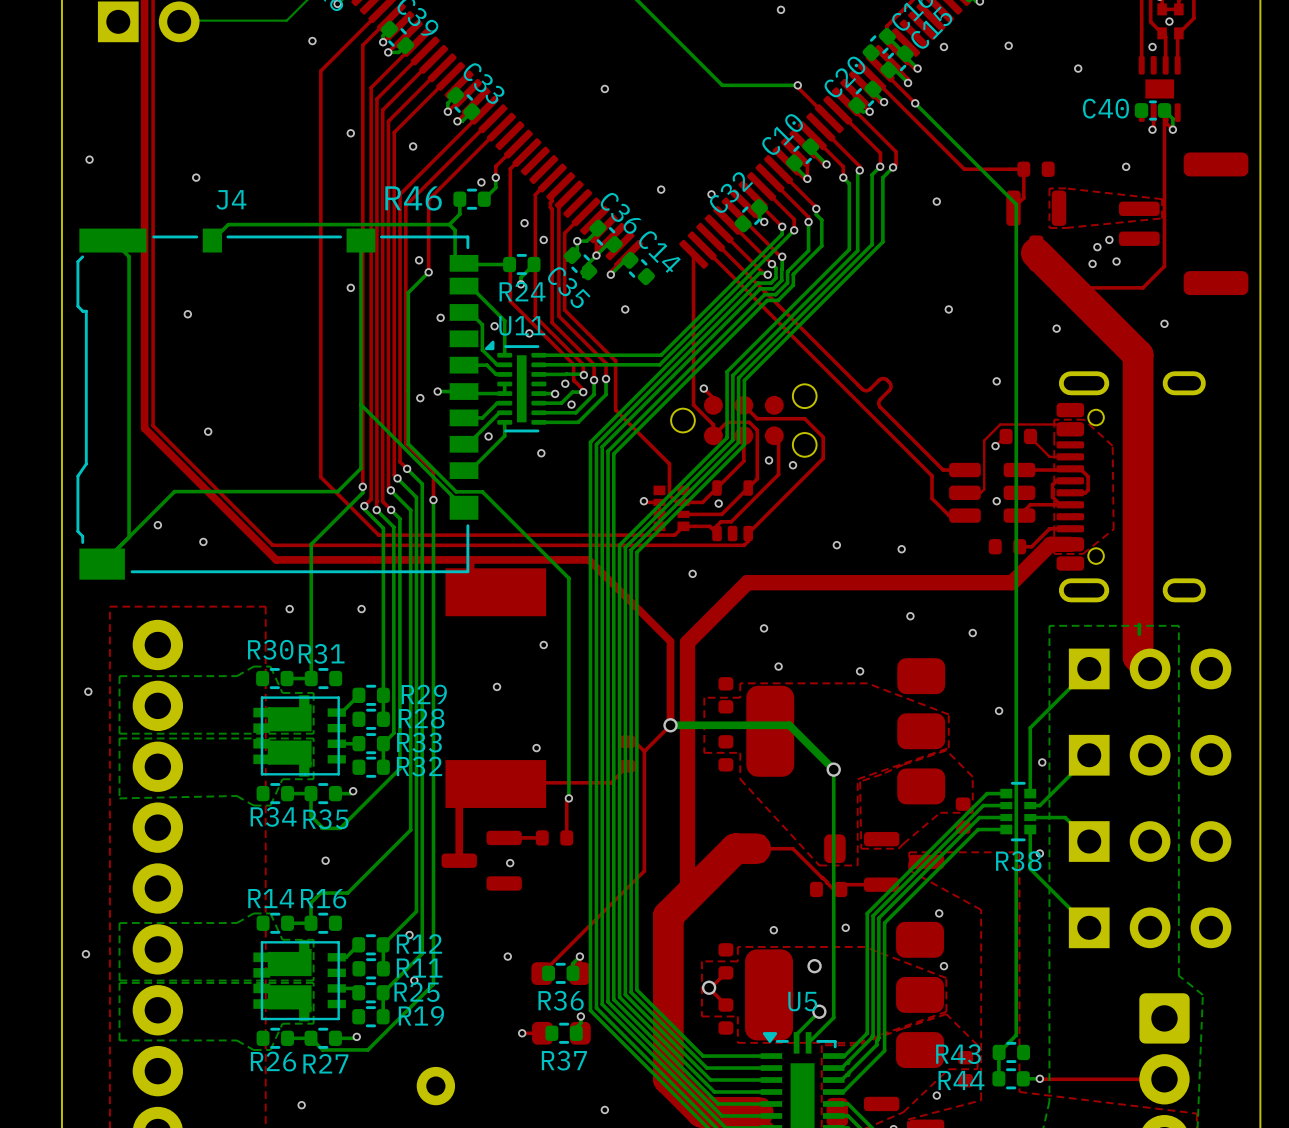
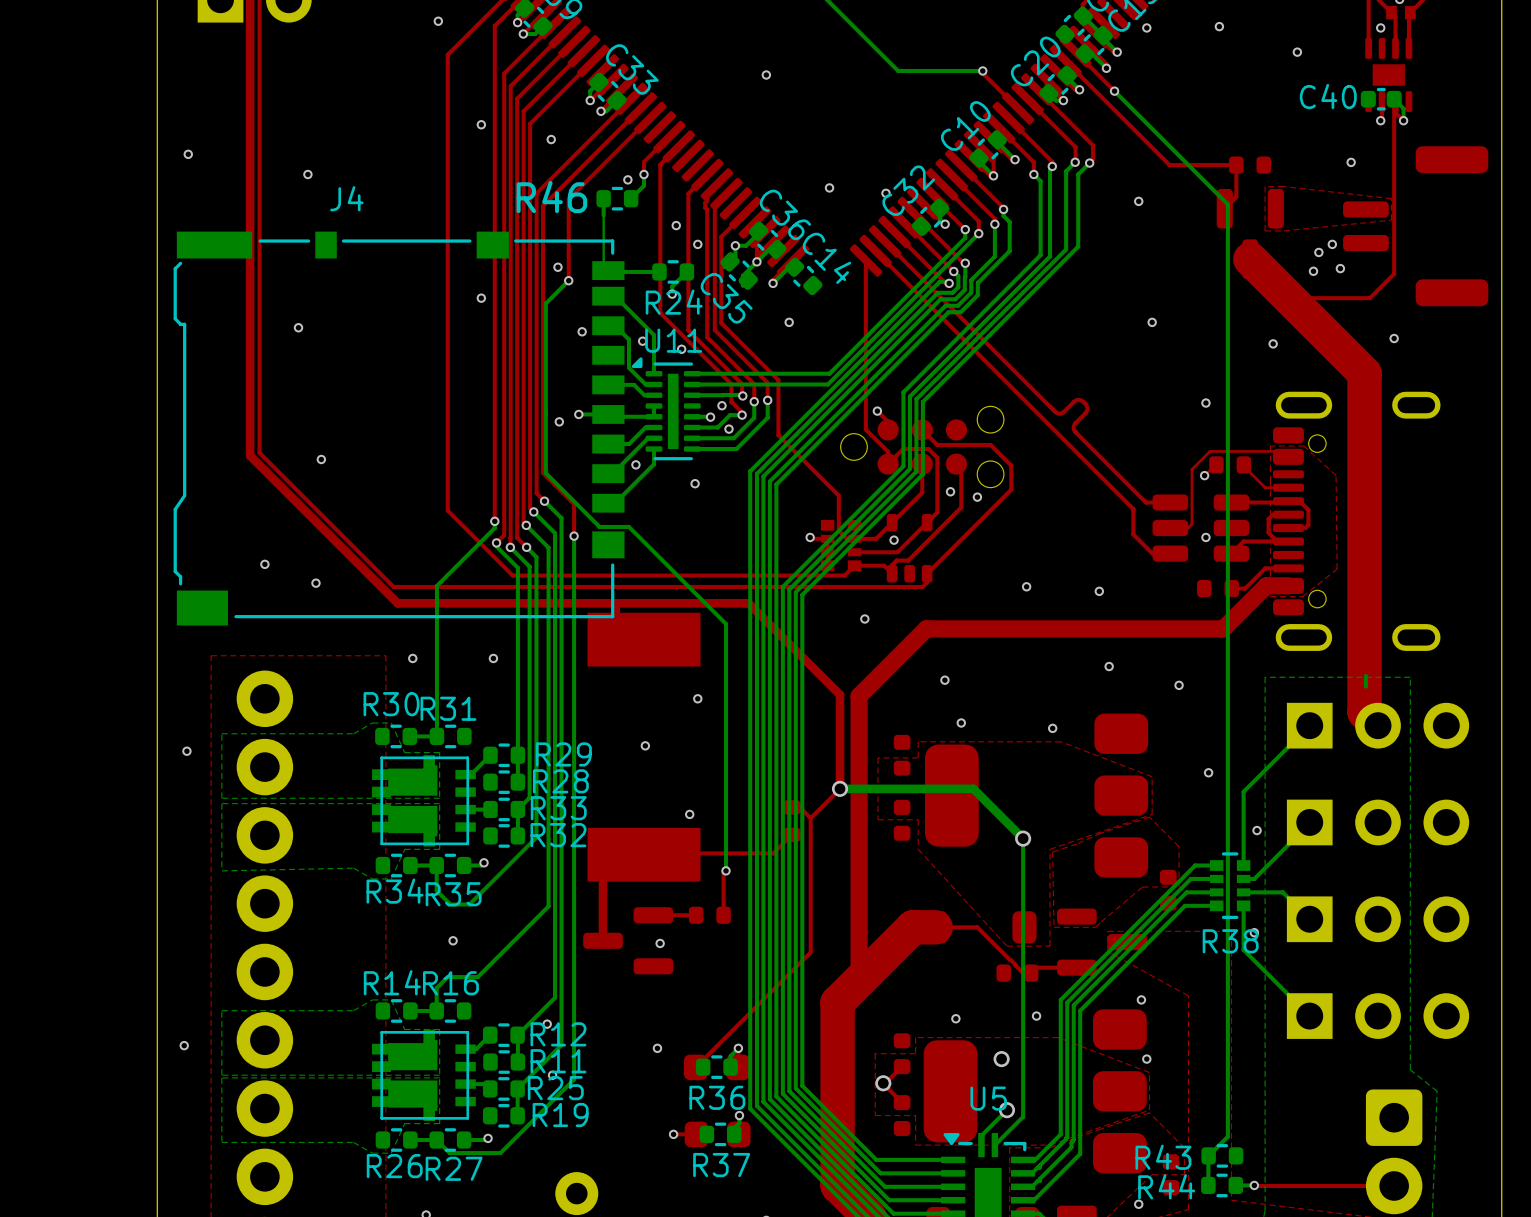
bottom track: (459, 214) (449, 224) -> (603, 215) (603, 265) (608, 270)
bottom track: (449, 224) (228, 224) (212, 240) -> none
bottom track: (449, 224) (455, 230) (455, 266) -> none
bottom track: (112, 240) (129, 256) (129, 537) -> none
bottom track: (360, 240) (360, 468) (337, 491) (174, 491) (102, 564) -> none
bottom track: (360, 404) (464, 507) -> none

